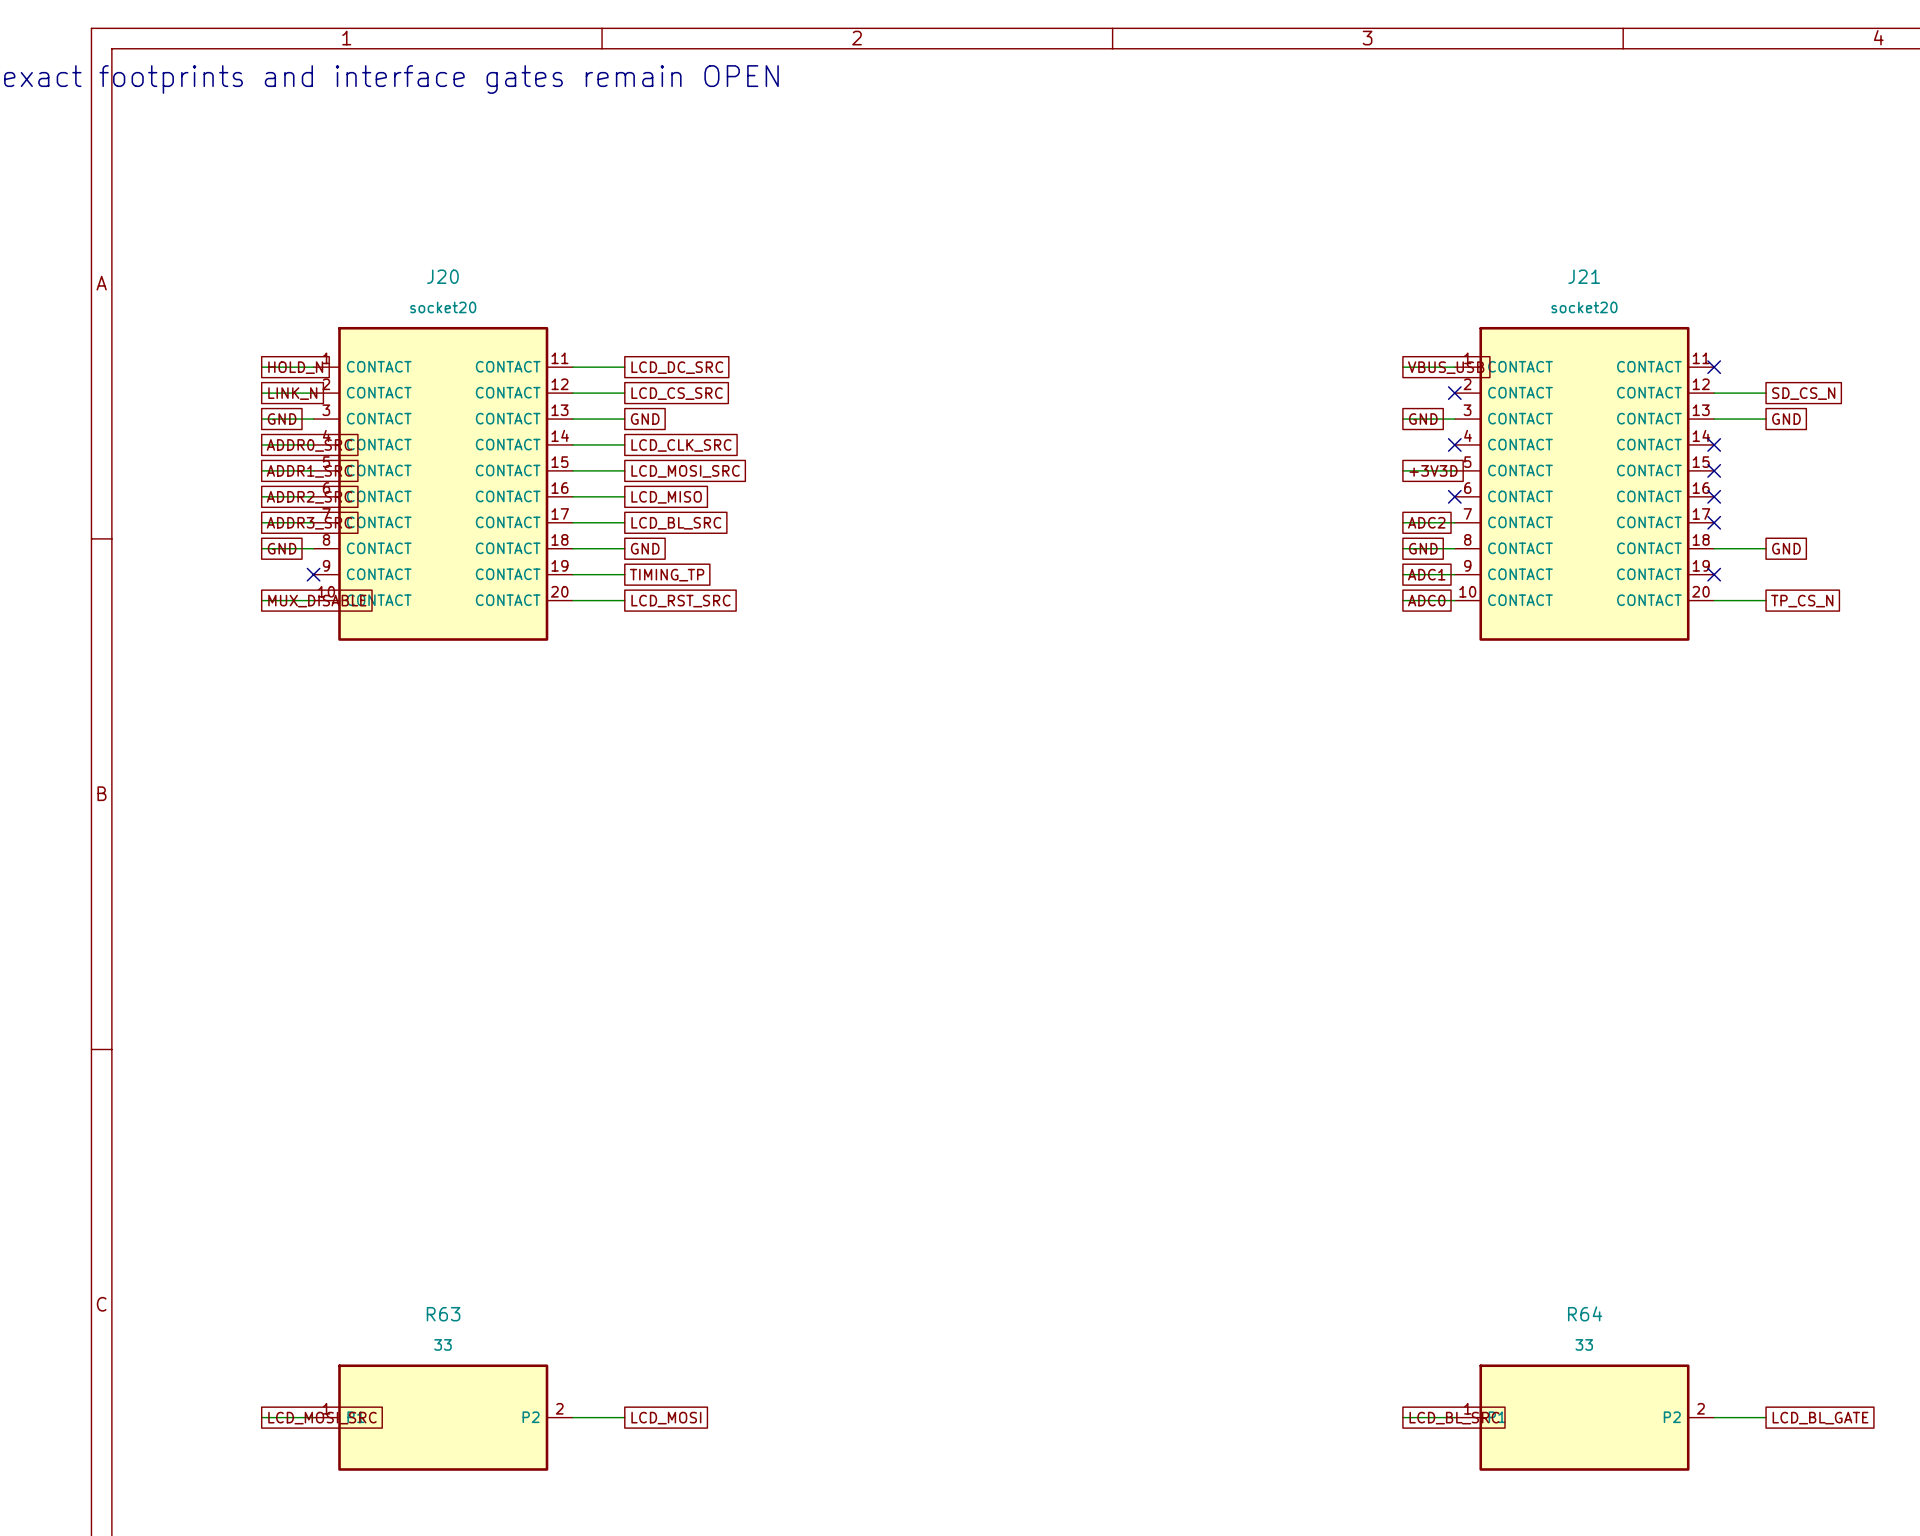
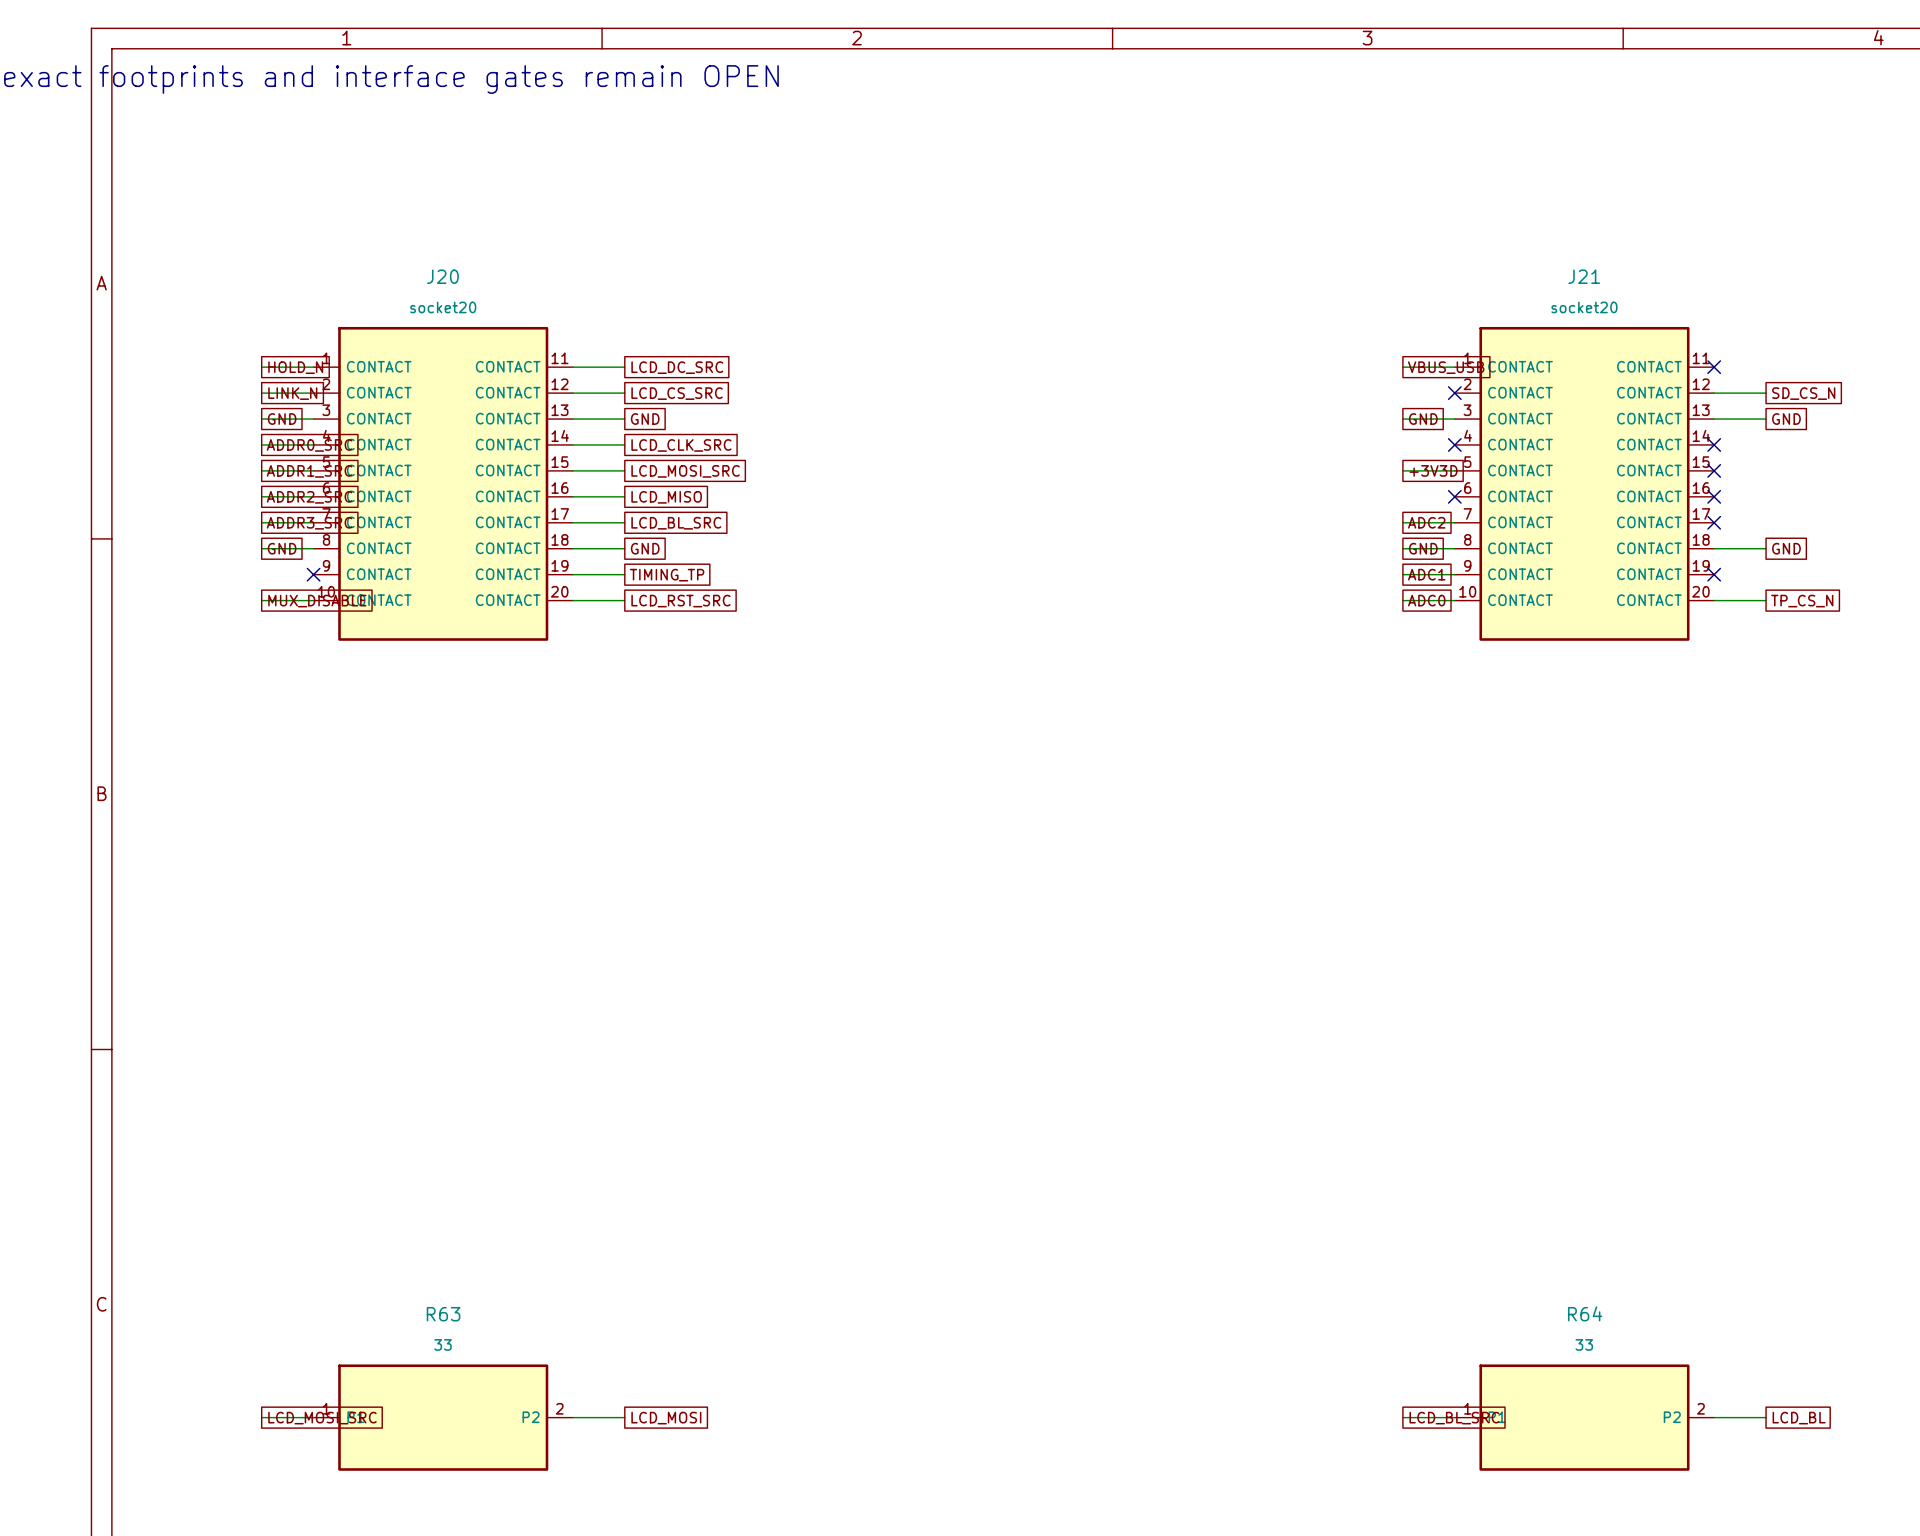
global label: LCD_BL_GATE (1820, 1418) -> LCD_BL (1799, 1418)

